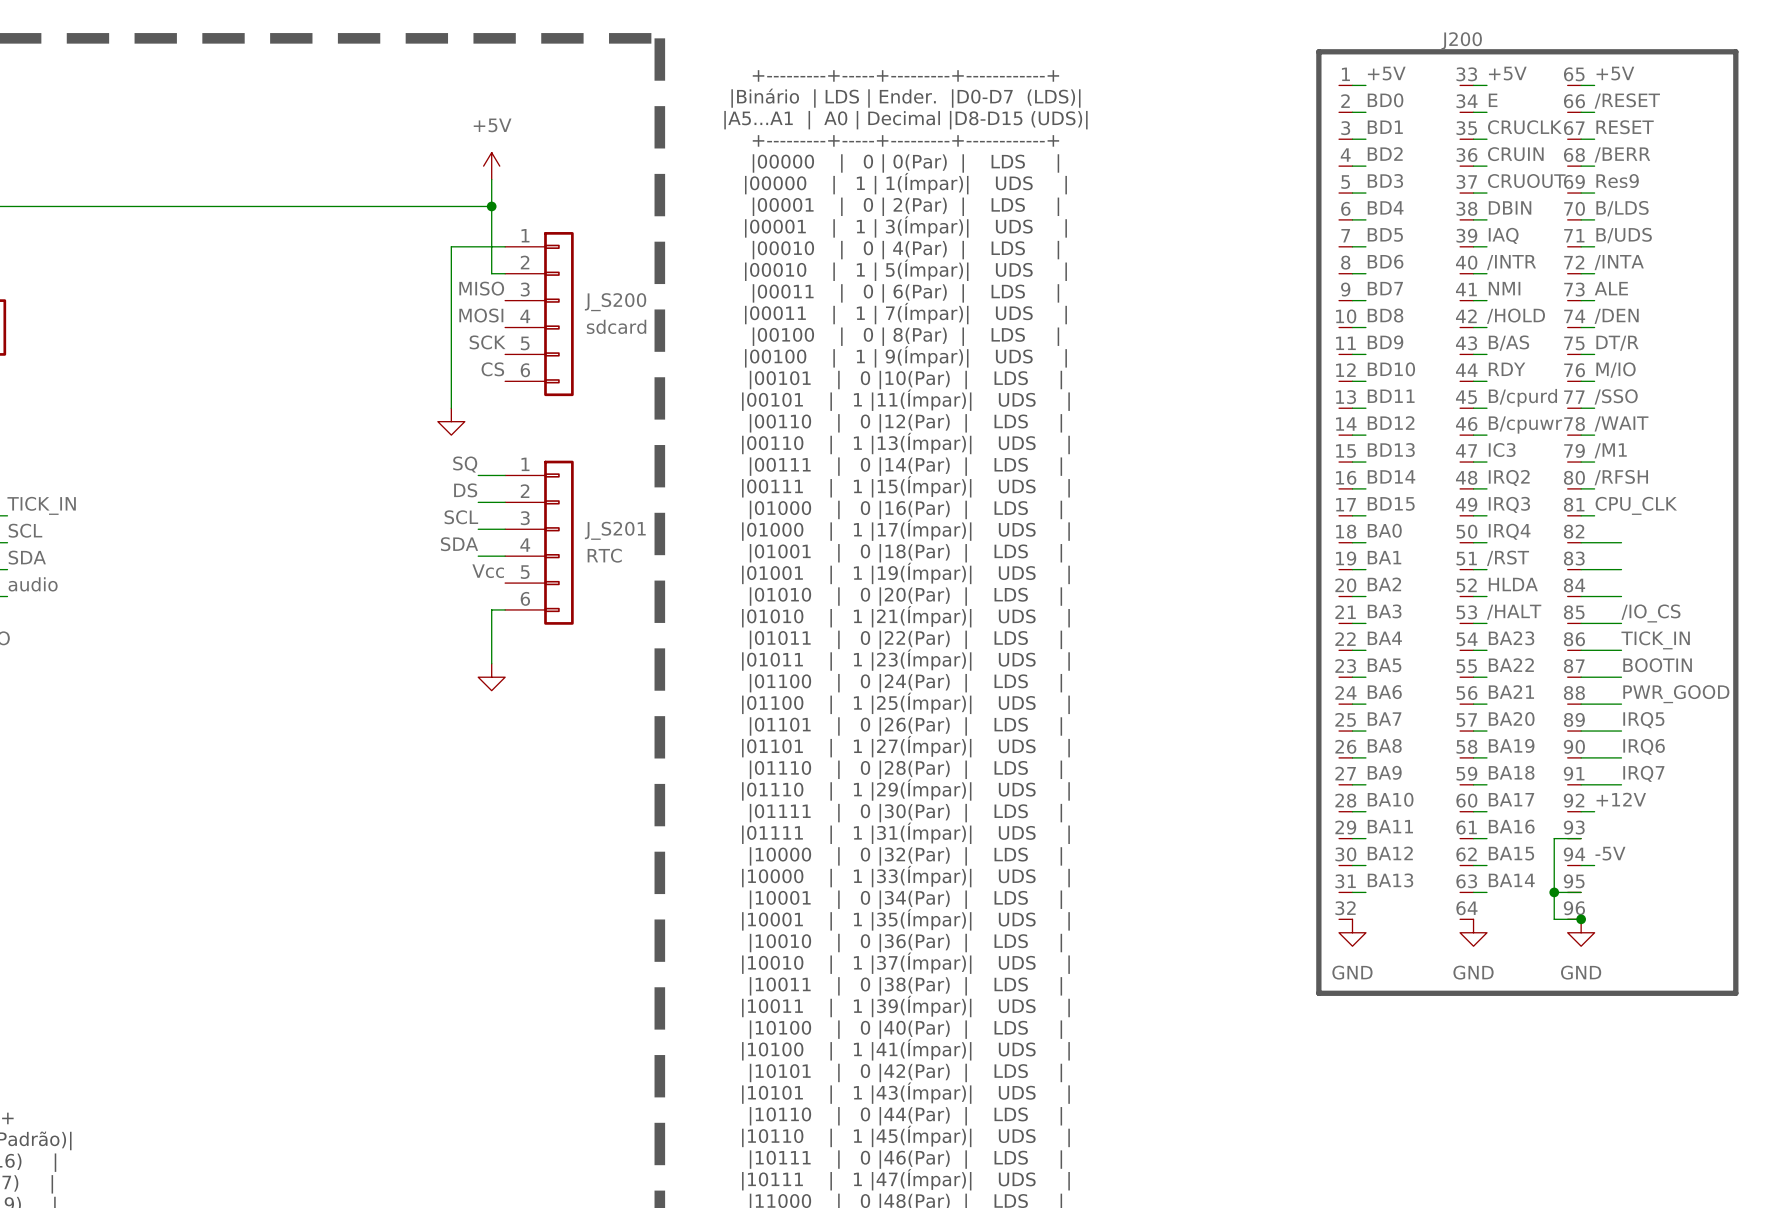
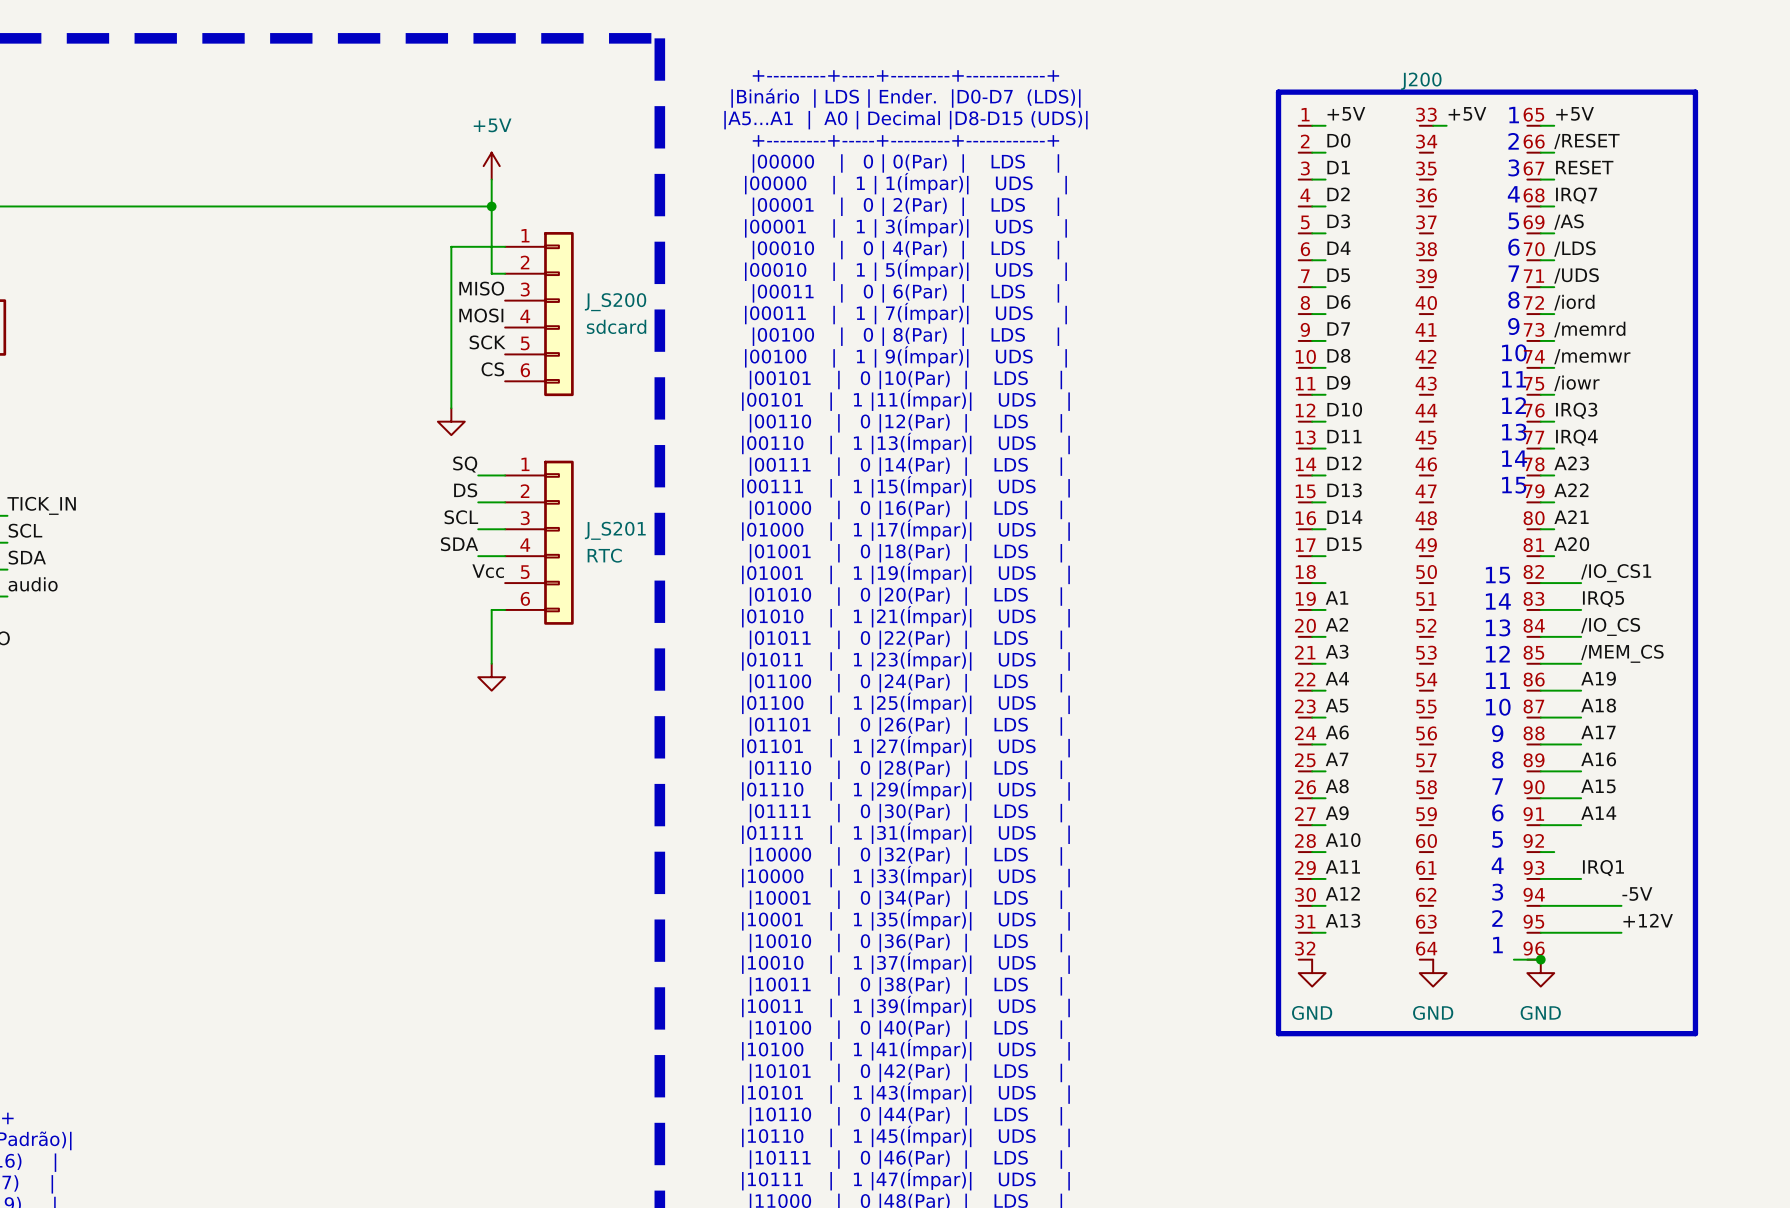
line: (1318, 51) (1735, 51) (1735, 993) (1318, 993) (1318, 51) -> (1278, 92) (1695, 92) (1695, 1033) (1278, 1033) (1278, 92)
label: +5V (1386, 73) -> none
label: +5V (1507, 73) -> none
label: +5V (1615, 73) -> none
wire: (1352, 85) (1365, 85) -> (1312, 125) (1325, 125)
wire: (1473, 85) (1486, 85) -> (1433, 125) (1446, 125)
wire: (1581, 85) (1594, 85) -> (1540, 125) (1554, 125)
label: BD0 (1385, 100) -> none
label: E (1493, 100) -> none
label position: /RESET (1627, 101) -> /RESET (1586, 141)
wire: (1352, 112) (1365, 112) -> (1312, 152) (1325, 152)
wire: (1473, 112) (1486, 112) -> none
wire: (1581, 112) (1594, 112) -> (1540, 152) (1554, 152)
label: none -> +5V (1346, 113)
label: none -> +5V (1467, 113)
label: none -> +5V (1575, 113)
text: none -> 1 (1514, 115)
label: BD1 (1385, 127) -> none
label: CRUCLK (1524, 127) -> none
label position: RESET (1625, 127) -> RESET (1584, 167)
wire: (1352, 139) (1365, 139) -> (1312, 179) (1325, 179)
wire: (1473, 139) (1486, 139) -> none
wire: (1581, 139) (1594, 139) -> (1540, 179) (1554, 179)
label: none -> D0 (1338, 140)
text: none -> 2 (1513, 141)
label: BD2 (1385, 153) -> none
label: CRUIN (1515, 154) -> none
label: /BERR (1622, 154) -> none
wire: (1352, 166) (1365, 166) -> (1312, 206) (1325, 206)
wire: (1473, 166) (1486, 166) -> none
wire: (1581, 166) (1594, 166) -> (1540, 206) (1554, 206)
label: none -> D1 (1338, 167)
text: none -> 3 (1513, 167)
label: BD3 (1385, 181) -> none
label: CRUOUT (1526, 181) -> none
label: Res9 (1617, 181) -> none
wire: (1352, 193) (1365, 193) -> (1312, 233) (1325, 233)
wire: (1473, 193) (1486, 193) -> none
wire: (1581, 193) (1594, 193) -> (1540, 233) (1554, 233)
label: none -> D2 (1338, 194)
text: none -> 4 (1513, 194)
label: none -> IRQ7 (1576, 195)
label: BD4 (1385, 207) -> none
label: DBIN (1510, 207) -> none
label: B/LDS (1622, 208) -> none
wire: (1352, 219) (1365, 219) -> (1312, 260) (1325, 260)
wire: (1473, 219) (1486, 219) -> none
wire: (1581, 219) (1594, 219) -> (1540, 260) (1554, 260)
text: none -> 5 (1513, 220)
label: none -> D3 (1338, 221)
label: none -> /AS (1569, 222)
label: BD5 (1385, 234) -> none
label: IAQ (1503, 235) -> none
label: B/UDS (1624, 235) -> /LDS (1574, 249)
wire: (1352, 246) (1365, 246) -> (1312, 287) (1325, 287)
wire: (1473, 246) (1486, 246) -> none
wire: (1581, 246) (1594, 246) -> (1540, 287) (1554, 287)
text: none -> 6 (1513, 247)
label: none -> D4 (1338, 248)
label: BD6 (1385, 261) -> none
label: /INTR (1511, 262) -> none
label: /INTA (1619, 262) -> none
wire: (1352, 273) (1365, 273) -> (1312, 314) (1325, 314)
wire: (1473, 273) (1486, 273) -> none
text: none -> 7 (1513, 273)
wire: (1581, 273) (1594, 273) -> (1540, 314) (1554, 314)
label: none -> D5 (1338, 275)
label: none -> /UDS (1576, 275)
label: BD7 (1385, 288) -> none
label: NMI (1504, 288) -> none
label: ALE (1611, 288) -> none
wire: (1352, 300) (1365, 300) -> (1312, 340) (1325, 340)
wire: (1473, 300) (1486, 300) -> none
text: none -> 8 (1513, 300)
wire: (1581, 300) (1594, 300) -> (1540, 340) (1554, 340)
label: none -> D6 (1338, 302)
label: none -> /iord (1574, 302)
label: BD8 (1385, 315) -> none
label: /HOLD (1515, 316) -> none
label: /DEN (1616, 316) -> none
text: none -> 9 (1513, 326)
wire: (1352, 327) (1365, 327) -> (1312, 367) (1325, 367)
wire: (1473, 327) (1486, 327) -> none
wire: (1581, 327) (1594, 327) -> (1540, 367) (1554, 367)
label: none -> D7 (1338, 328)
label: none -> /memrd (1589, 329)
label: BD9 (1385, 342) -> none
label: B/AS (1508, 343) -> none
label: DT/R (1617, 343) -> none
text: none -> 10 (1514, 352)
wire: (1352, 354) (1365, 354) -> (1312, 394) (1325, 394)
wire: (1473, 354) (1486, 354) -> none
wire: (1581, 354) (1594, 354) -> (1540, 394) (1554, 394)
label: none -> D8 (1338, 355)
label: none -> /memwr (1592, 356)
label: BD10 (1391, 369) -> none
label: RDY (1507, 369) -> none
label: M/IO (1616, 370) -> none
text: none -> 11 (1514, 379)
wire: (1352, 381) (1365, 381) -> (1312, 421) (1325, 421)
wire: (1473, 381) (1486, 381) -> none
wire: (1581, 381) (1594, 381) -> (1540, 421) (1554, 421)
label: none -> D9 (1338, 382)
label: none -> /iowr (1576, 383)
label: BD11 (1391, 396) -> none
label: /SSO (1616, 396) -> none
label: B/cpurd (1522, 397) -> none
text: none -> 12 (1514, 405)
wire: (1352, 408) (1365, 408) -> (1312, 448) (1325, 448)
wire: (1473, 408) (1486, 408) -> none
wire: (1581, 408) (1594, 408) -> (1540, 448) (1554, 448)
label: none -> D10 (1344, 409)
label: BD12 (1391, 422) -> none
label: /WAIT (1621, 423) -> none
label: B/cpuwr (1525, 425) -> none
text: none -> 13 (1514, 432)
wire: (1352, 435) (1365, 435) -> (1312, 475) (1325, 475)
wire: (1473, 435) (1486, 435) -> none
wire: (1581, 435) (1594, 435) -> (1540, 475) (1554, 475)
label: none -> D11 (1344, 436)
label: BD13 (1391, 450) -> none
label: IC3 (1502, 450) -> none
label: /M1 (1610, 450) -> none
text: none -> 14 (1514, 458)
wire: (1352, 462) (1365, 462) -> (1312, 502) (1325, 502)
wire: (1473, 462) (1486, 462) -> none
wire: (1581, 462) (1594, 462) -> (1540, 502) (1554, 502)
label: none -> D12 (1344, 463)
label: none -> A23 (1571, 463)
label: BD14 (1391, 476) -> none
label: IRQ2 (1509, 477) -> none
label: /RFSH (1621, 477) -> none
text: none -> 15 (1514, 485)
wire: (1352, 488) (1365, 488) -> (1312, 529) (1325, 529)
wire: (1473, 488) (1486, 488) -> none
wire: (1581, 488) (1594, 488) -> (1540, 529) (1554, 529)
label: none -> D13 (1344, 490)
label: none -> A22 (1571, 490)
J200 position: (1460, 502) -> (1419, 542)
label: BD15 (1391, 503) -> none
label position: IRQ3 (1509, 504) -> IRQ3 (1576, 410)
label: CPU_CLK (1636, 505) -> none
wire: (1352, 515) (1365, 515) -> (1312, 556) (1325, 556)
wire: (1473, 515) (1486, 515) -> none
wire: (1581, 515) (1594, 515) -> (1540, 556) (1554, 556)
label: none -> D14 (1344, 517)
label: none -> A21 (1571, 517)
label: BA0 (1384, 530) -> none
label position: IRQ4 (1509, 531) -> IRQ4 (1576, 437)
wire: (1352, 542) (1365, 542) -> (1312, 583) (1325, 583)
wire: (1473, 542) (1486, 542) -> none
wire: (1581, 542) (1621, 542) -> (1540, 583) (1581, 583)
label: none -> D15 (1344, 544)
label: none -> A20 (1571, 544)
label: BA1 (1384, 557) -> none
label: /RST (1508, 558) -> none
wire: (1352, 569) (1365, 569) -> (1312, 609) (1325, 609)
wire: (1473, 569) (1486, 569) -> none
wire: (1581, 569) (1621, 569) -> (1540, 609) (1581, 609)
label: none -> /IO_CS1 (1616, 573)
text: none -> 15 (1498, 575)
label: BA2 (1384, 584) -> none
label: HLDA (1513, 584) -> none
wire: (1352, 596) (1365, 596) -> (1312, 636) (1325, 636)
wire: (1473, 596) (1486, 596) -> none
wire: (1581, 596) (1621, 596) -> (1540, 636) (1581, 636)
label: none -> A1 (1336, 597)
text: none -> 14 (1498, 601)
label: BA3 (1384, 611) -> none
label: /HALT (1514, 612) -> none
label position: /IO_CS (1650, 613) -> /IO_CS (1610, 626)
wire: (1352, 623) (1365, 623) -> (1312, 663) (1325, 663)
wire: (1473, 623) (1486, 623) -> none
wire: (1581, 623) (1621, 623) -> (1540, 663) (1581, 663)
label: none -> A2 (1336, 624)
text: none -> 13 (1498, 627)
label: BA4 (1384, 638) -> none
label: BA23 (1511, 638) -> none
label: TICK_IN (1655, 640) -> none
wire: (1352, 650) (1365, 650) -> (1312, 690) (1325, 690)
wire: (1473, 650) (1486, 650) -> none
wire: (1581, 650) (1621, 650) -> (1540, 690) (1581, 690)
label: none -> A3 (1337, 651)
label: none -> /MEM_CS (1622, 653)
text: none -> 12 (1497, 654)
label: BA5 (1384, 665) -> none
label: BA22 (1511, 665) -> none
label: BOOTIN (1657, 665) -> none
wire: (1352, 677) (1365, 677) -> (1312, 717) (1325, 717)
wire: (1473, 677) (1486, 677) -> none
wire: (1581, 677) (1621, 677) -> (1540, 717) (1581, 717)
label: none -> A4 (1337, 678)
label: none -> A19 (1598, 678)
text: none -> 11 (1497, 680)
label: BA21 (1511, 691) -> none
label: BA6 (1384, 692) -> none
label: PWR_GOOD (1676, 694) -> none
wire: (1352, 704) (1365, 704) -> (1312, 744) (1325, 744)
wire: (1473, 704) (1486, 704) -> none
wire: (1581, 704) (1621, 704) -> (1540, 744) (1581, 744)
label: none -> A5 (1337, 705)
label: none -> A18 (1598, 705)
text: none -> 10 (1498, 707)
label: BA7 (1384, 719) -> none
label: BA20 (1511, 719) -> none
label position: IRQ5 (1643, 720) -> IRQ5 (1603, 599)
wire: (1352, 731) (1365, 731) -> (1312, 771) (1325, 771)
wire: (1473, 731) (1486, 731) -> none
wire: (1581, 731) (1621, 731) -> (1540, 771) (1581, 771)
label: none -> A6 (1337, 732)
label: none -> A17 (1598, 732)
text: none -> 9 (1497, 733)
label: BA8 (1384, 745) -> none
label: BA19 (1511, 745) -> none
label: IRQ6 (1644, 746) -> none
wire: (1352, 757) (1365, 757) -> (1312, 798) (1325, 798)
wire: (1473, 757) (1486, 757) -> none
wire: (1581, 757) (1621, 757) -> (1540, 798) (1581, 798)
label: none -> A7 (1337, 759)
label: none -> A16 (1598, 759)
text: none -> 8 (1497, 760)
label: BA9 (1384, 772) -> none
label: BA18 (1511, 772) -> none
label: IRQ7 (1643, 773) -> none
wire: (1352, 784) (1365, 784) -> (1312, 825) (1325, 825)
wire: (1473, 784) (1486, 784) -> none
wire: (1581, 784) (1621, 784) -> (1540, 825) (1581, 825)
label: none -> A8 (1337, 786)
text: none -> 7 (1497, 786)
label: none -> A15 (1598, 786)
label: BA10 (1390, 799) -> none
label: BA17 (1511, 799) -> none
label position: +12V (1621, 799) -> +12V (1648, 920)
wire: (1352, 811) (1365, 811) -> (1312, 852) (1325, 852)
wire: (1473, 811) (1486, 811) -> none
wire: (1581, 811) (1594, 811) -> (1540, 852) (1554, 852)
text: none -> 6 (1497, 812)
label: none -> A9 (1337, 813)
label: none -> A14 (1598, 813)
label: BA11 (1390, 826) -> none
label: BA16 (1511, 826) -> none
wire: (1352, 838) (1365, 838) -> (1312, 878) (1325, 878)
wire: (1473, 838) (1486, 838) -> none
wire: (1581, 838) (1554, 838) (1554, 919) (1581, 919) -> none
text: none -> 5 (1497, 839)
label: none -> A10 (1343, 840)
label: BA12 (1390, 853) -> none
label: BA15 (1511, 853) -> none
label position: -5V (1610, 853) -> -5V (1637, 893)
wire: (1352, 865) (1365, 865) -> (1312, 905) (1325, 905)
wire: (1473, 865) (1486, 865) -> none
text: none -> 4 (1497, 865)
wire: (1581, 865) (1594, 865) -> none
label: none -> A11 (1342, 866)
label: none -> IRQ1 (1603, 868)
wire: none -> (1540, 878) (1581, 878)
label: BA13 (1390, 880) -> none
label: BA14 (1511, 880) -> none
wire: (1352, 892) (1365, 892) -> (1312, 932) (1325, 932)
wire: (1473, 892) (1486, 892) -> none
text: none -> 3 (1497, 892)
wire: (1554, 892) (1581, 892) -> (1513, 959) (1540, 959)
junction: (1554, 892) -> none
label: none -> A12 (1342, 893)
wire: none -> (1540, 905) (1621, 905)
text: none -> 2 (1497, 918)
junction: (1581, 919) -> none
label: none -> A13 (1342, 920)
power symbol: GND (1352, 932) -> none
power symbol: GND (1473, 932) -> none
wire: none -> (1540, 932) (1621, 932)
power symbol: GND (1581, 932) -> none
text: none -> 1 (1497, 945)
junction: none -> (1540, 959)
power symbol: none -> GND (1312, 973)
power symbol: none -> GND (1433, 973)
power symbol: none -> GND (1540, 973)

